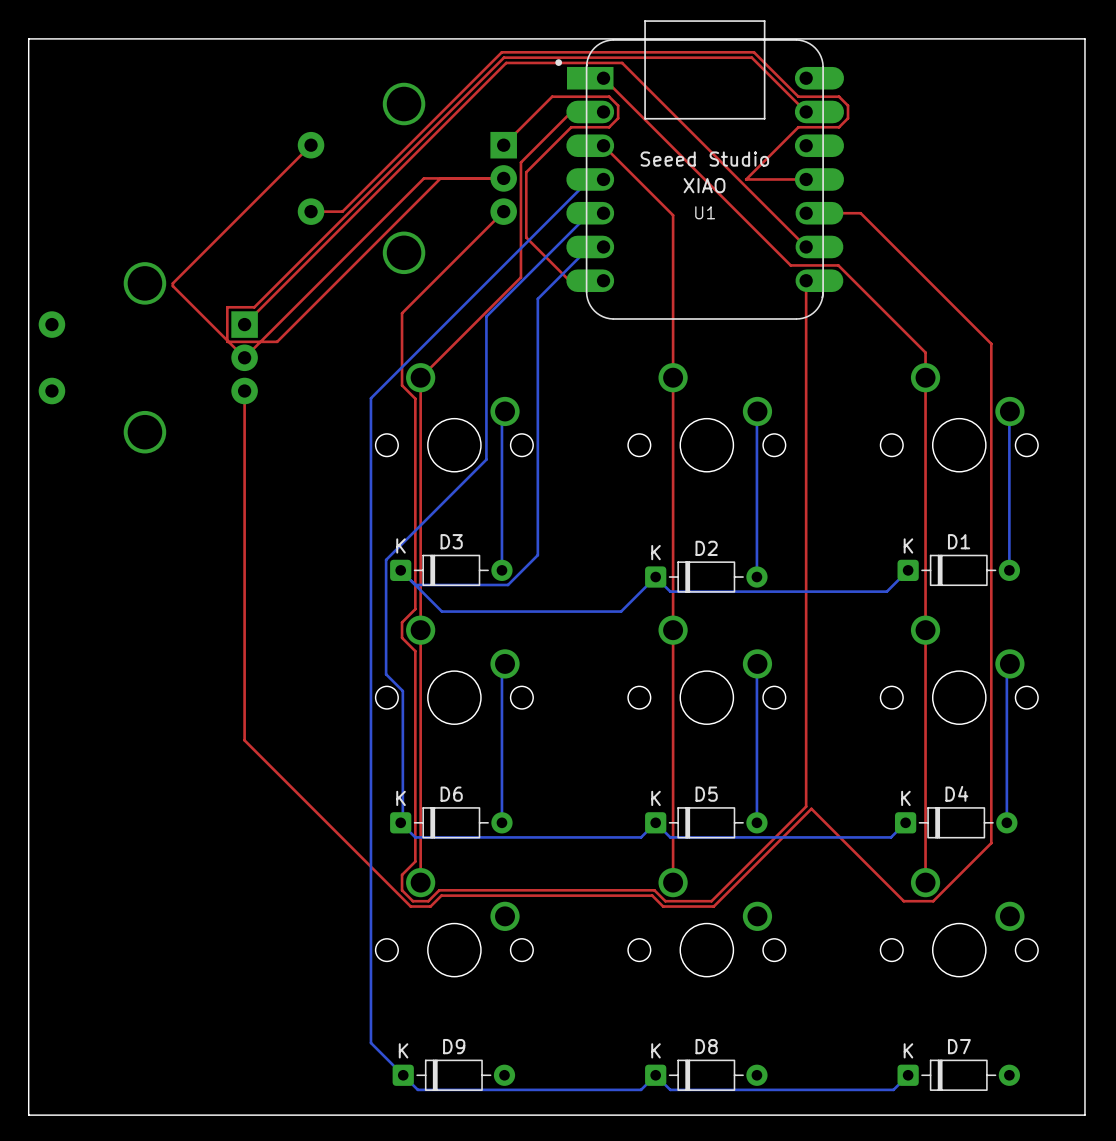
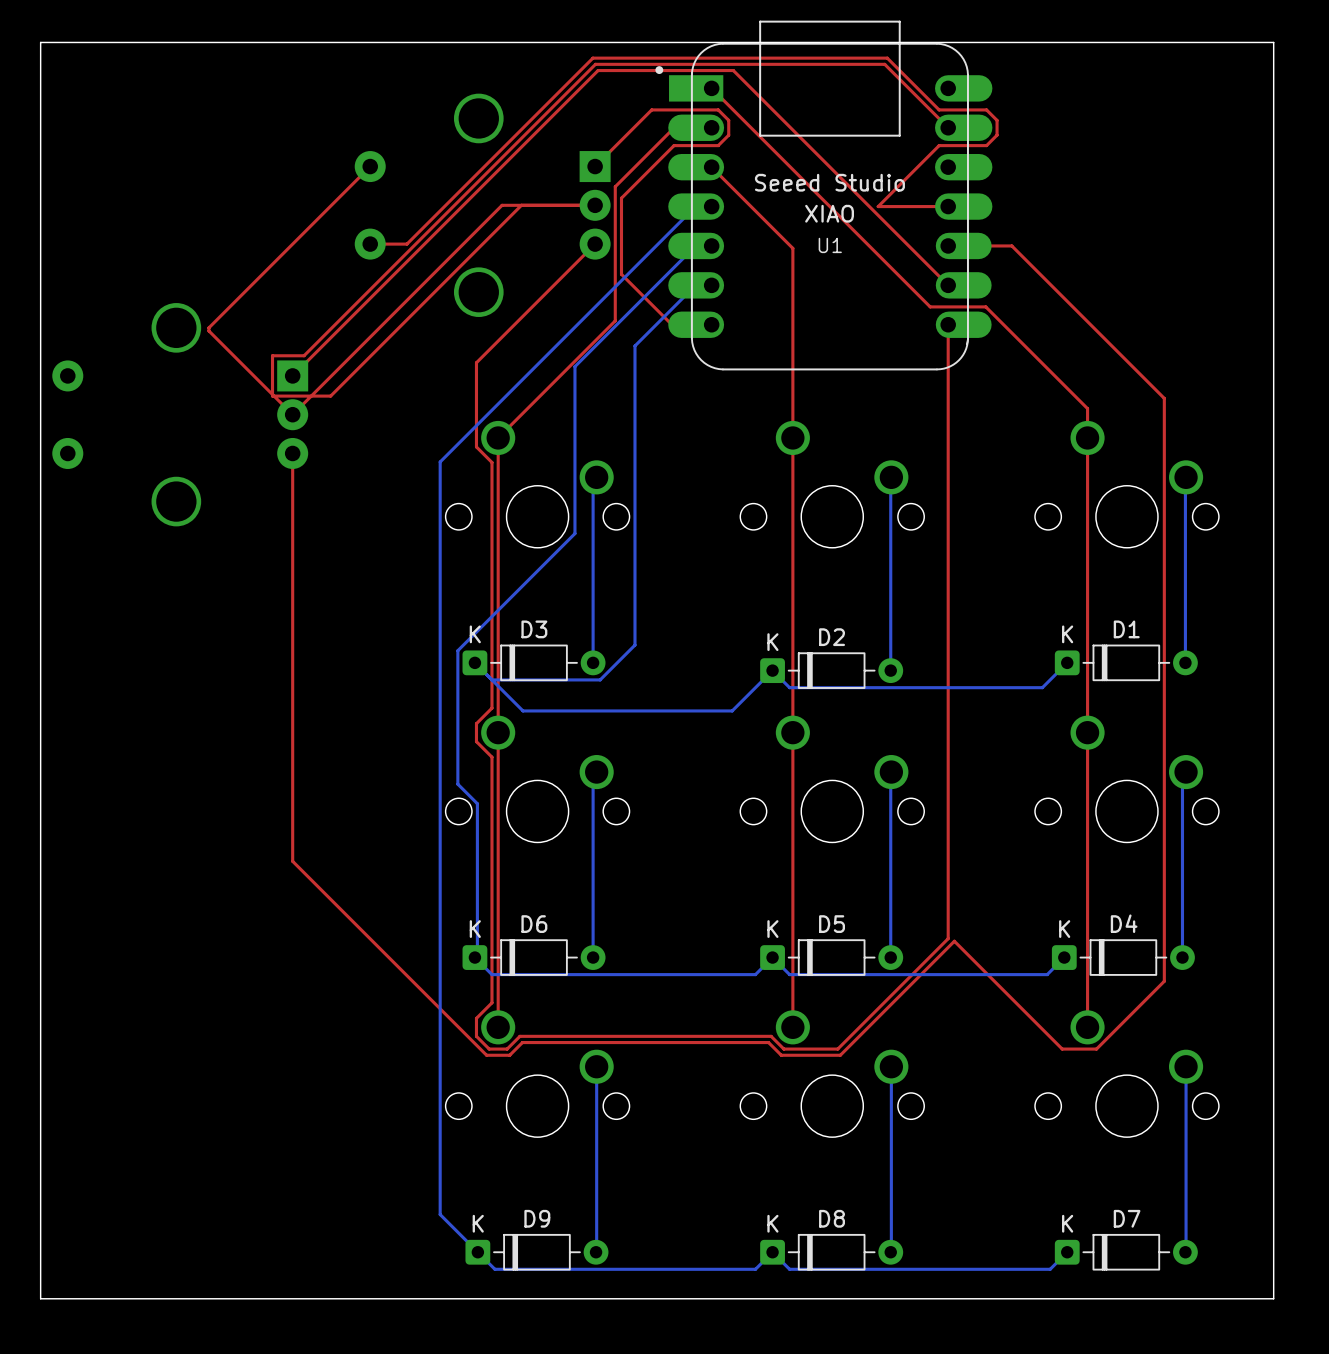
bottom track: none -> (596, 1066) (596, 1252)
bottom track: none -> (891, 1066) (890, 1252)
bottom track: none -> (1186, 1066) (1185, 1252)

